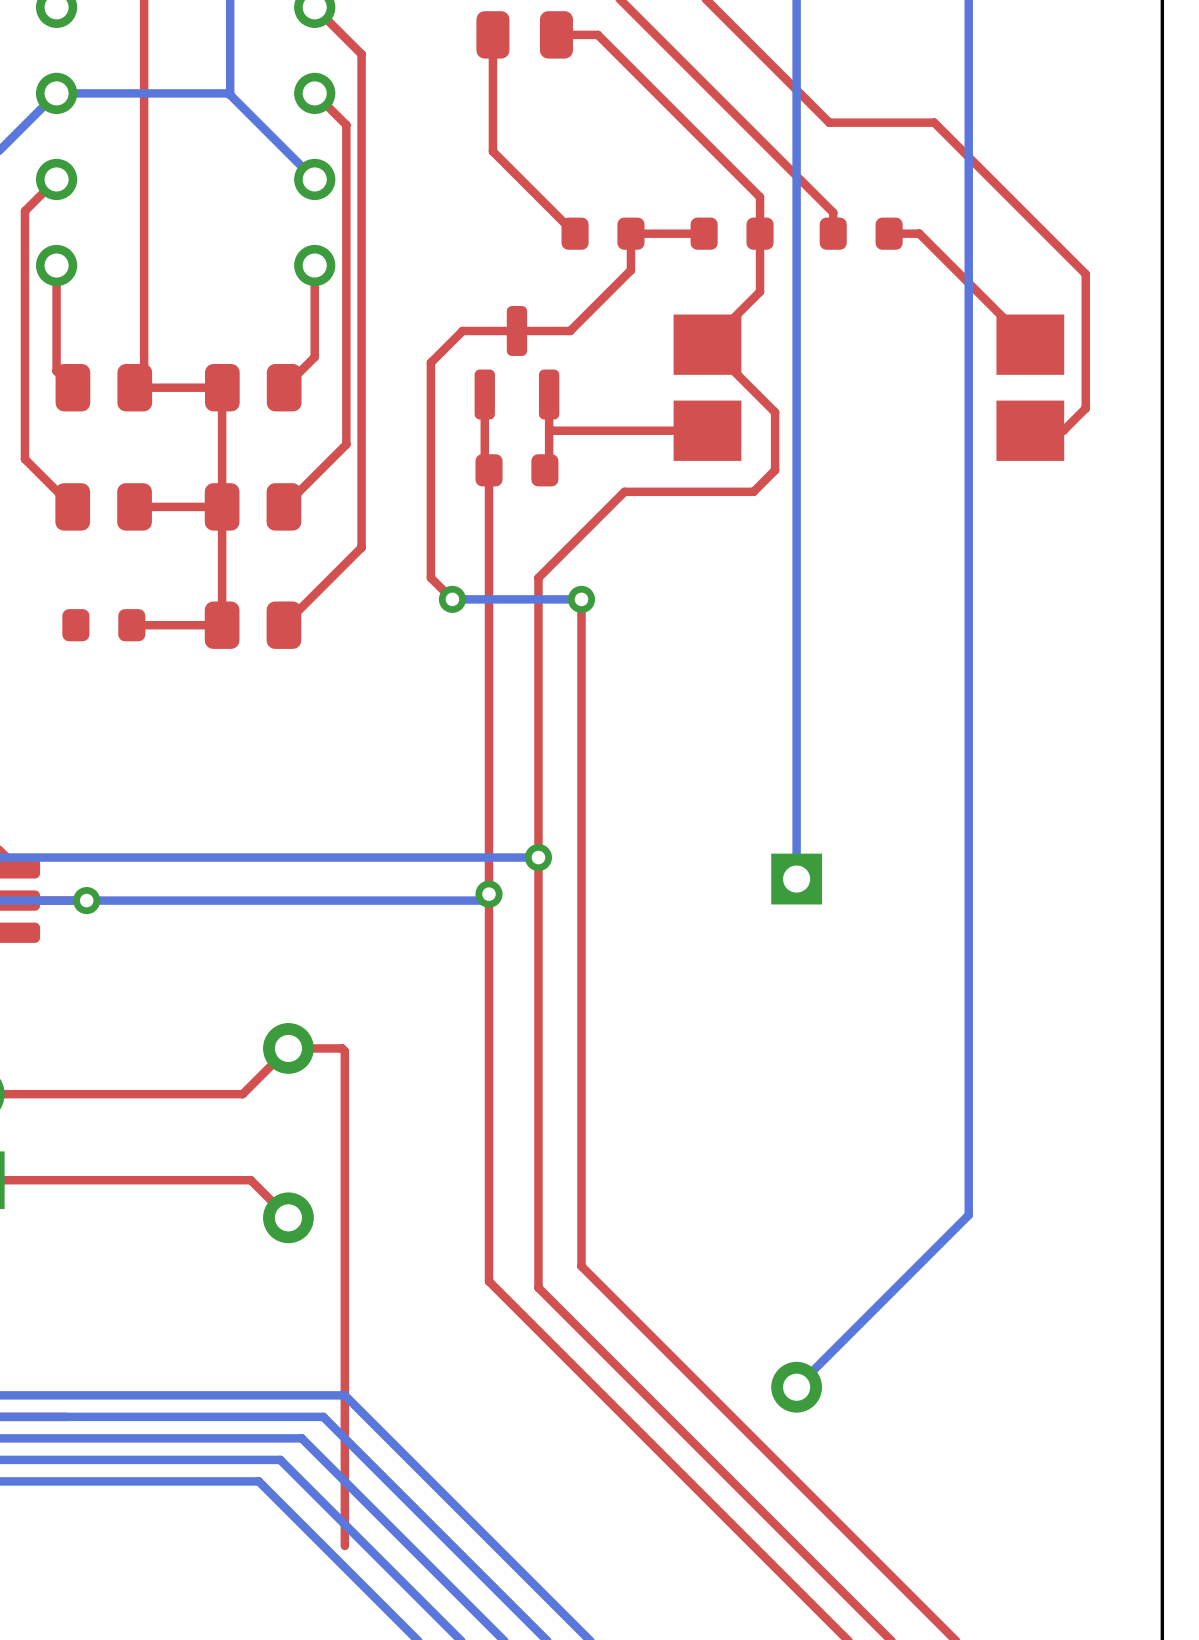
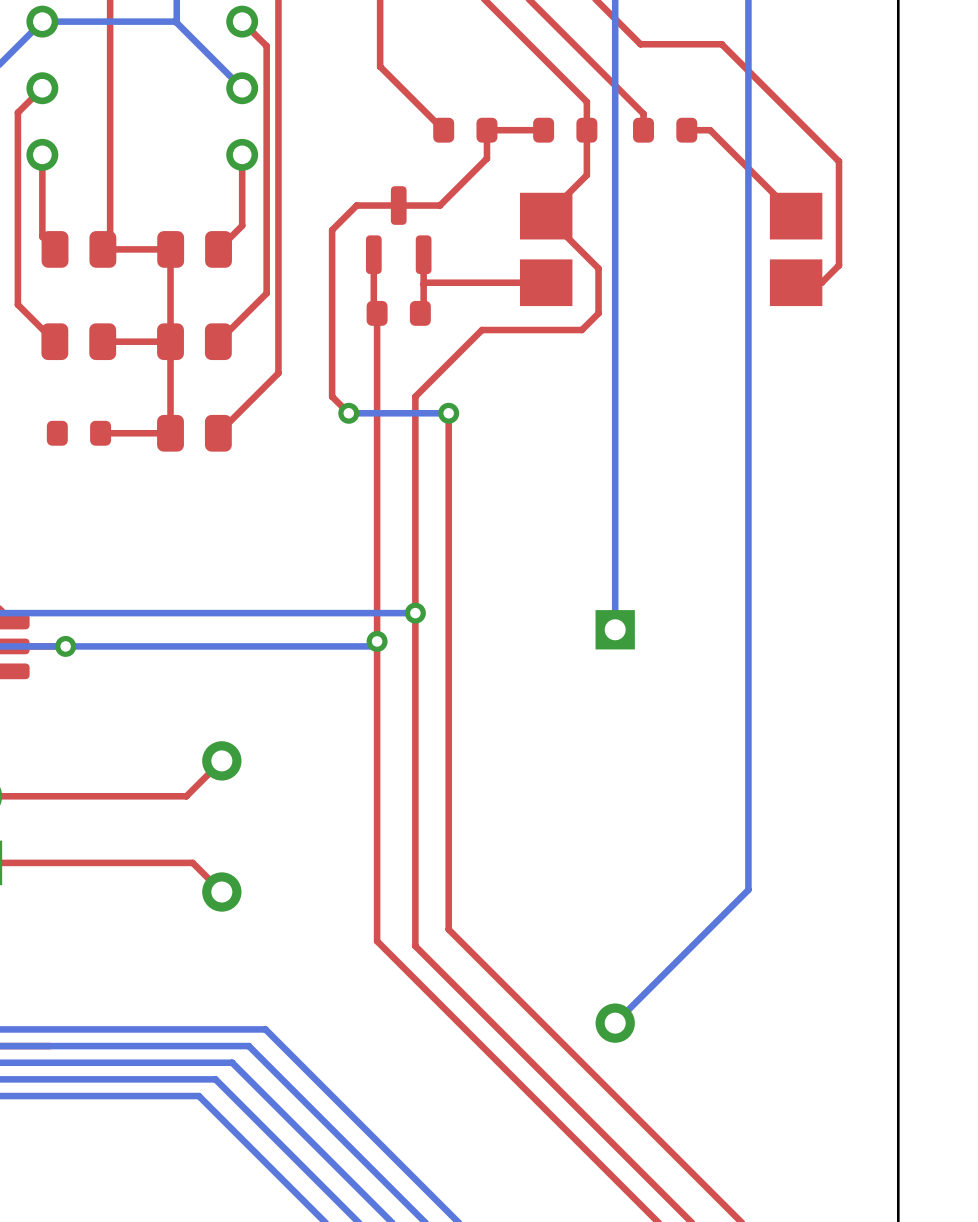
top track: (288, 1048) (342, 1048) (344, 1051) (344, 1545) -> none

